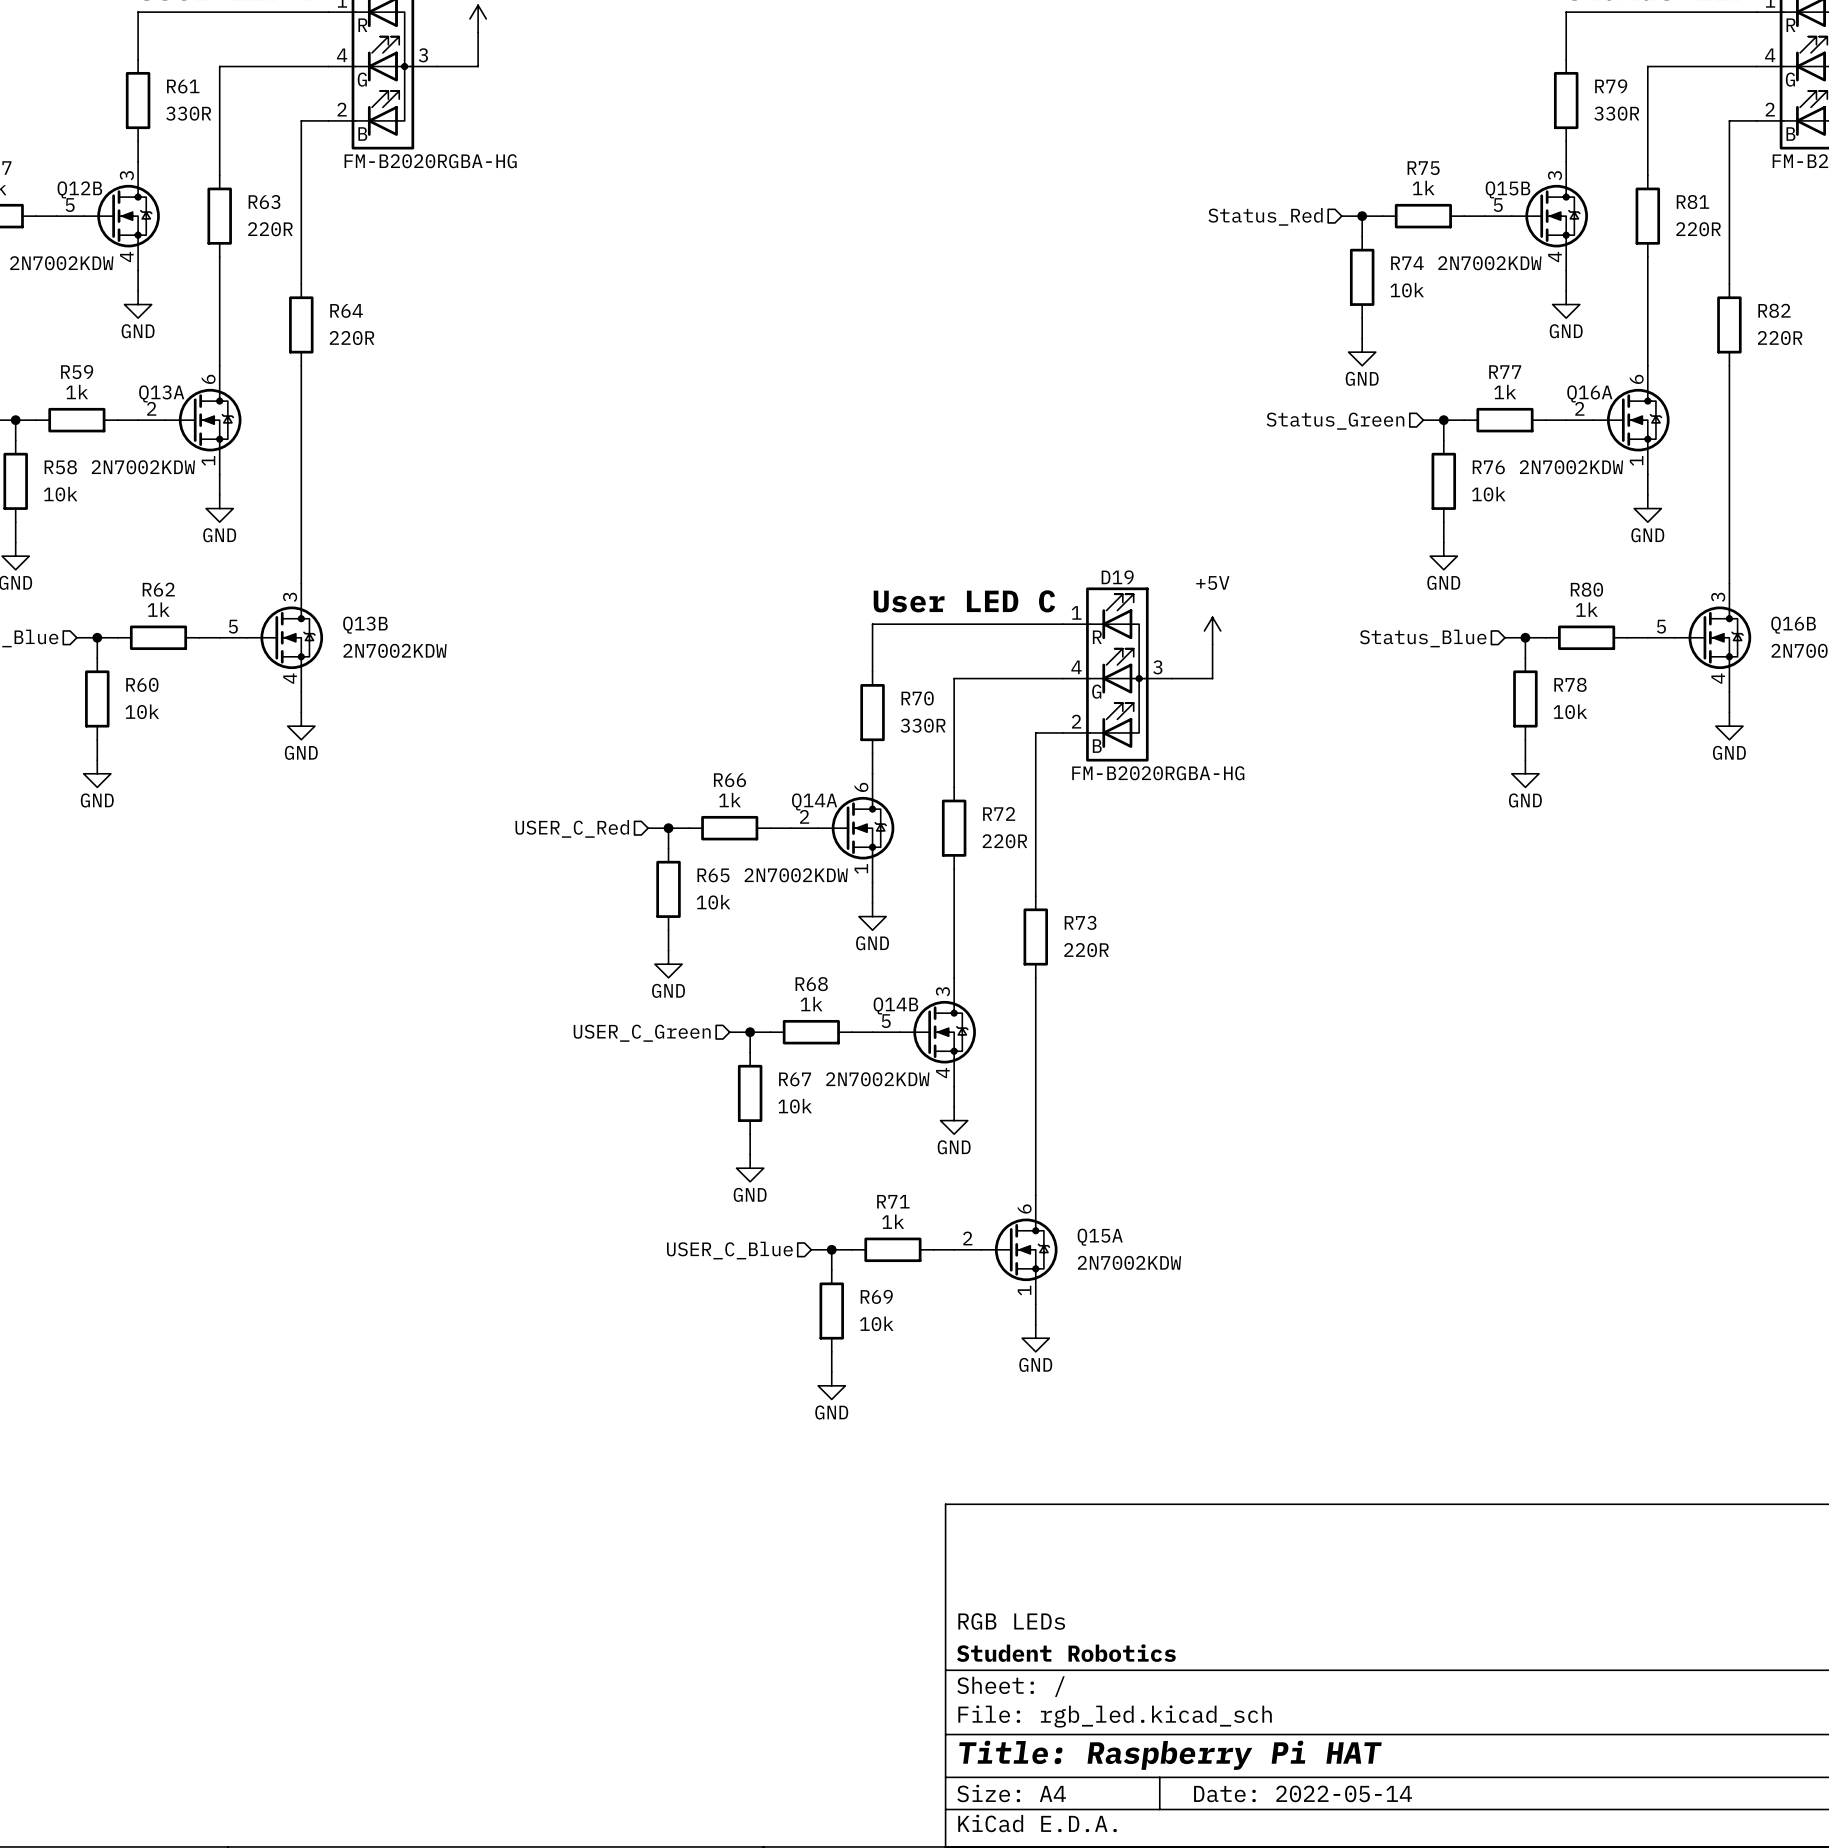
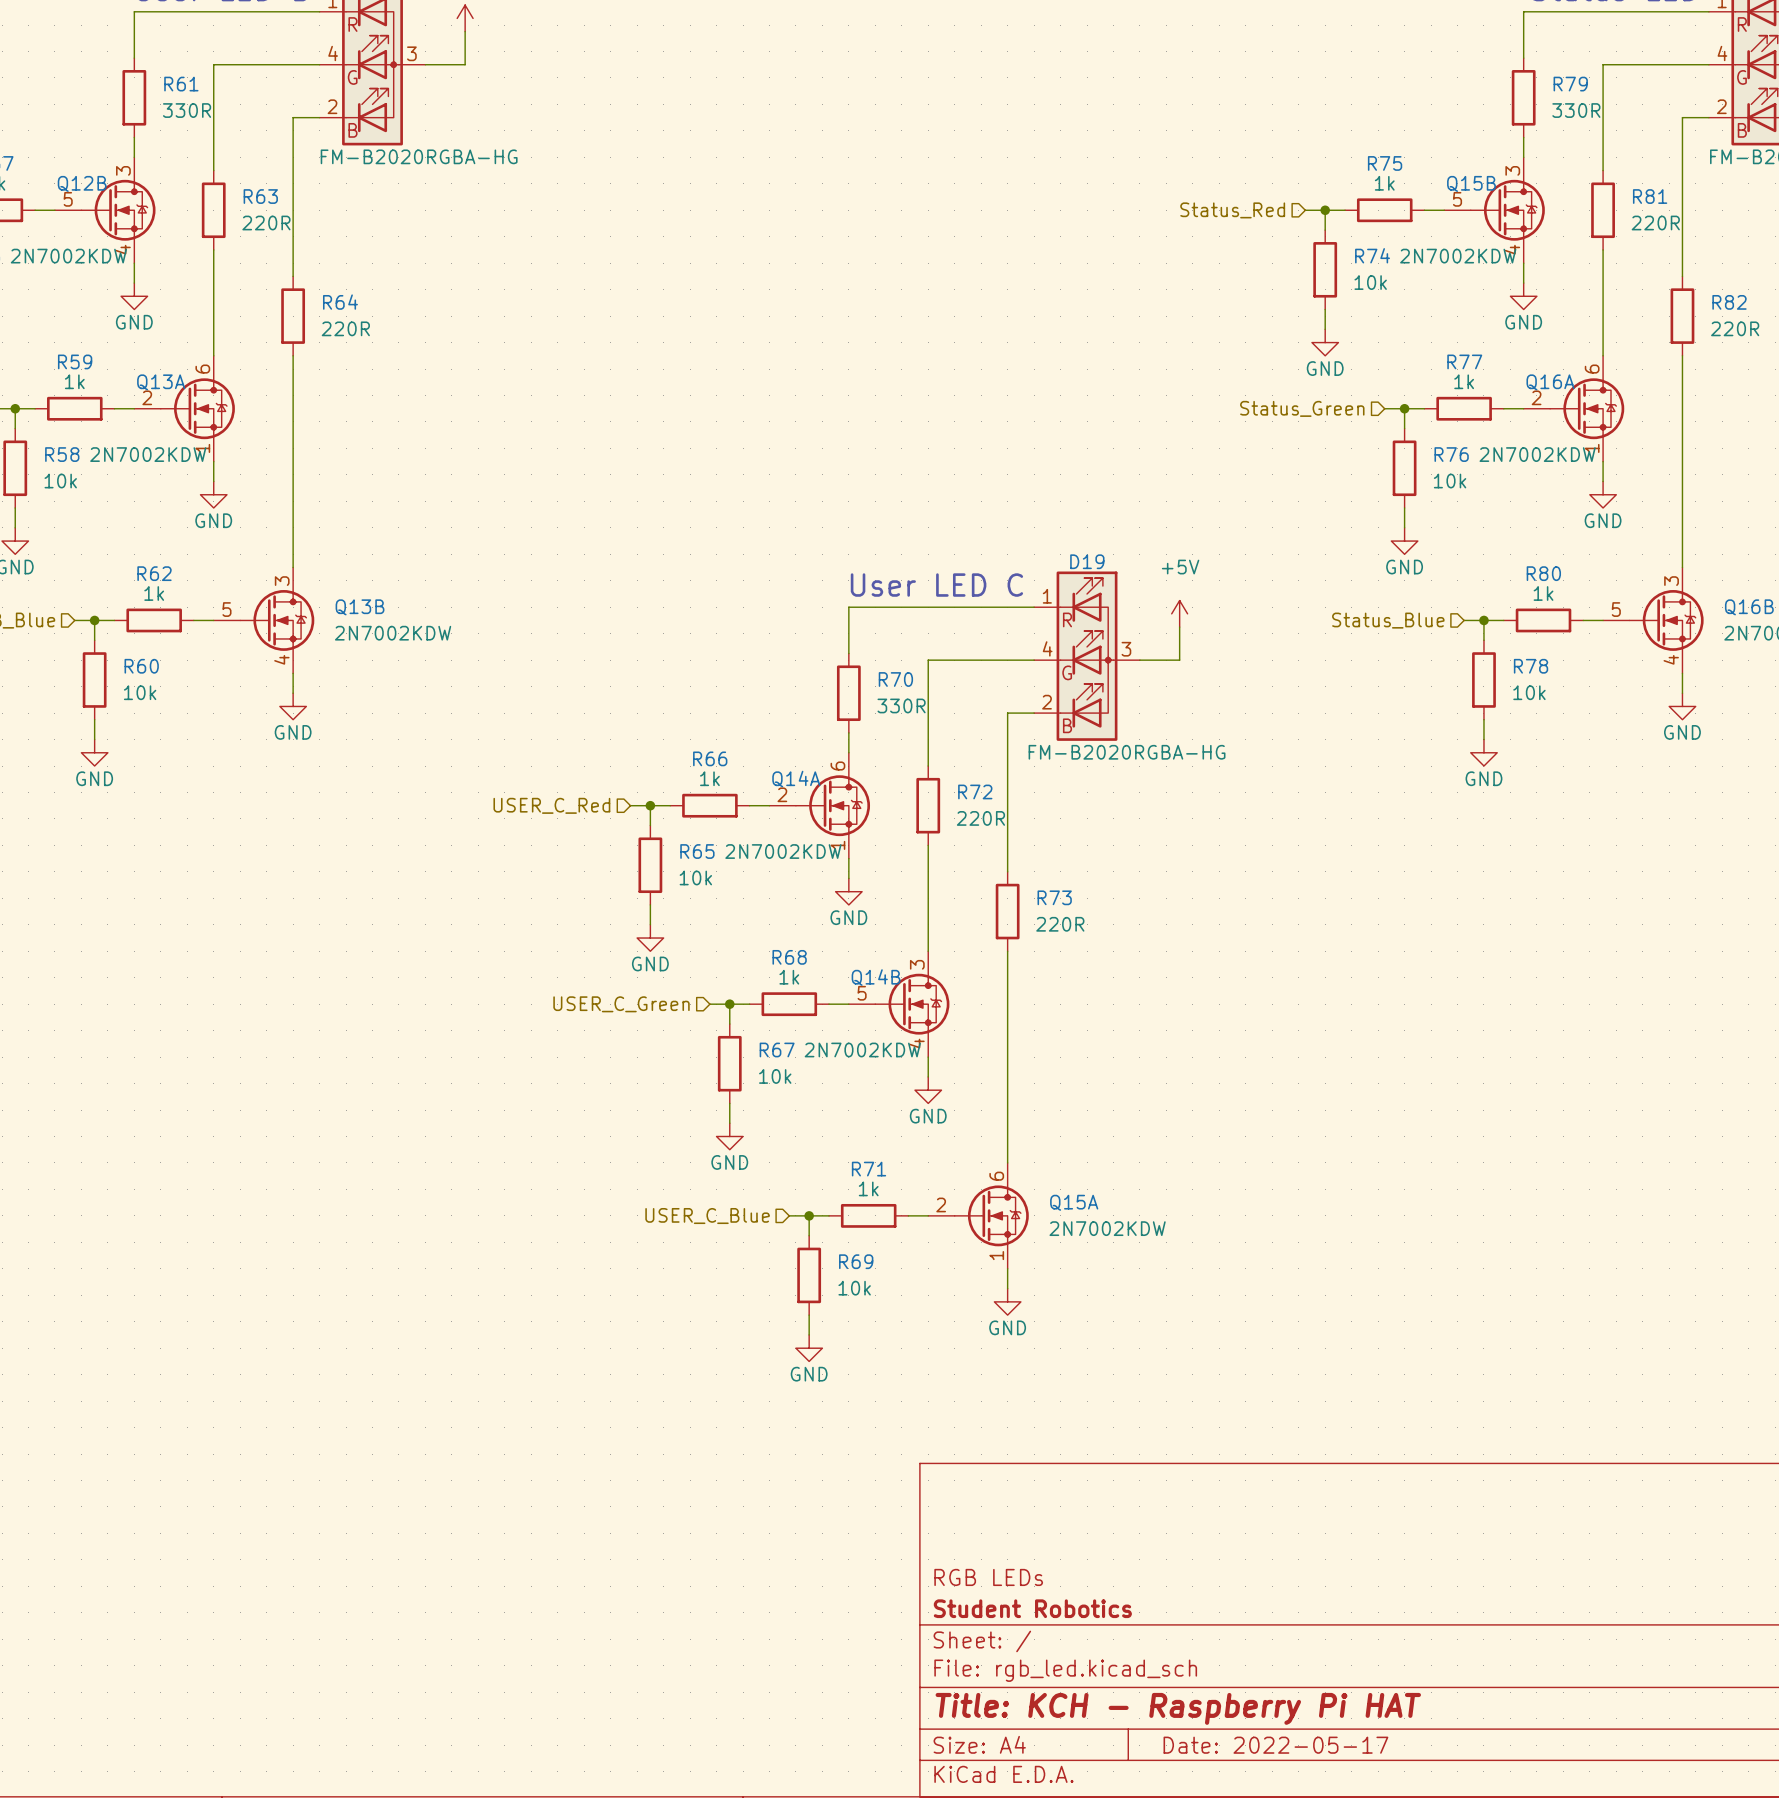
title block: Title: Raspberry Pi HAT (1170, 1755) -> Title: KCH - Raspberry Pi HAT (1178, 1708)
title block: Date: 2022-05-14 (1303, 1793) -> Date: 2022-05-17 (1275, 1745)

